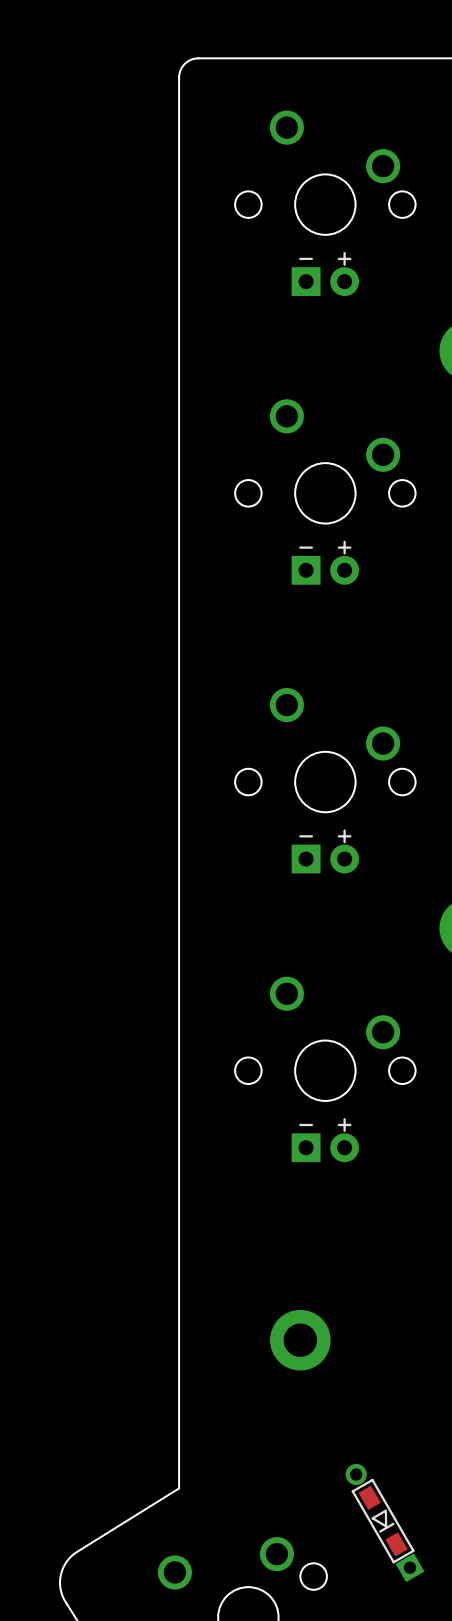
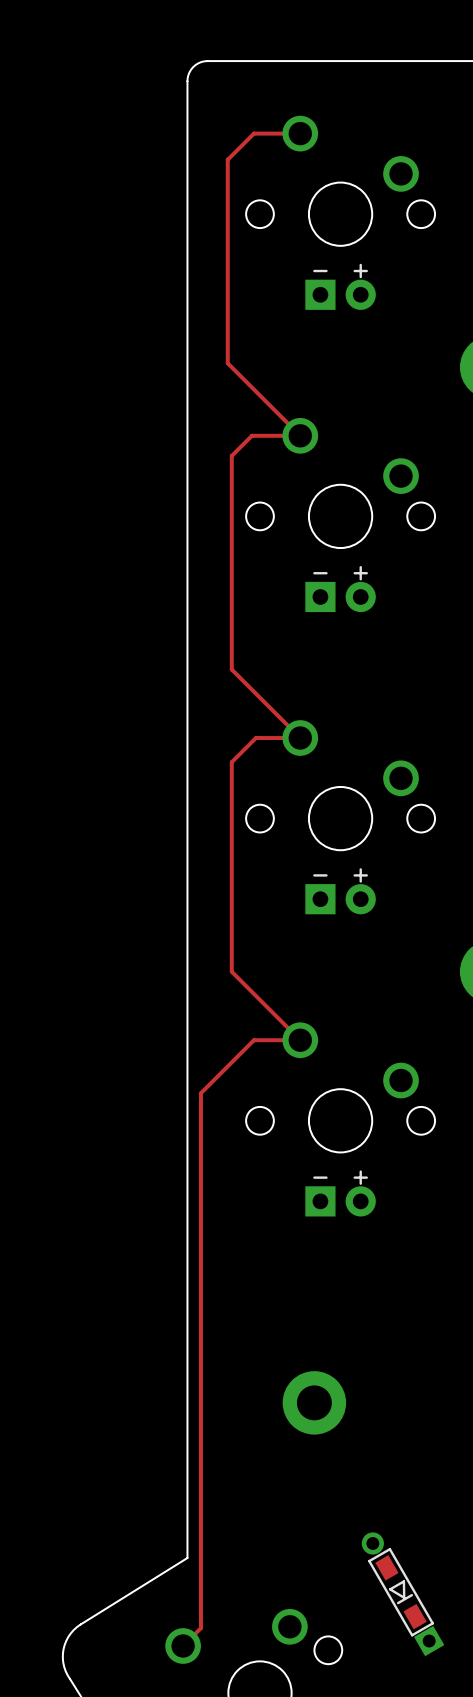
track: none -> (300, 133) (253, 133) (227, 159) (227, 363) (300, 435) (251, 435) (231, 455) (231, 669) (300, 738) (255, 738) (231, 762) (231, 971) (300, 1040) (253, 1040) (200, 1093) (200, 1628) (183, 1646)

